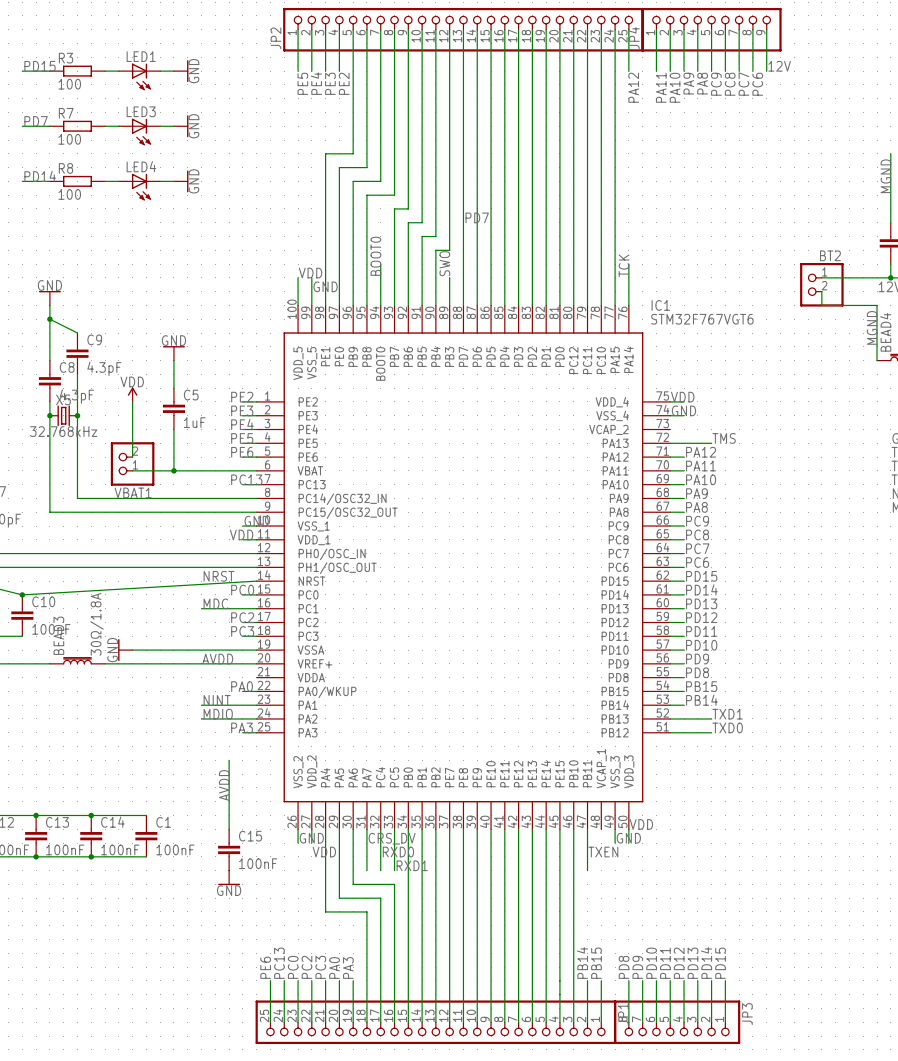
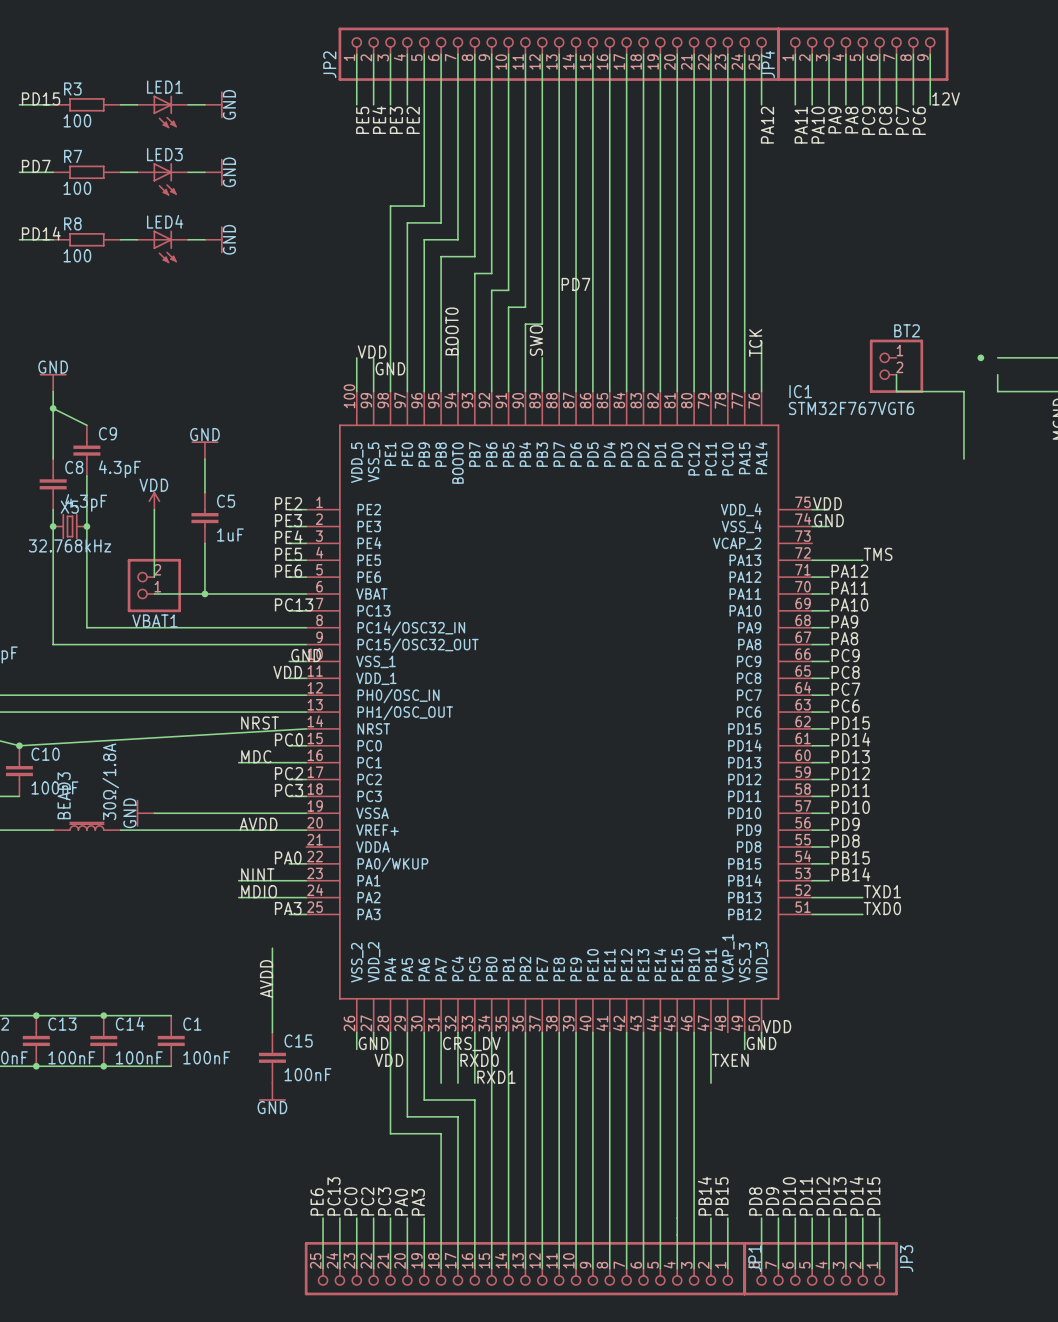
junction: none -> (980, 357)
BT2 position: (821, 284) -> (896, 366)
wire: none -> (896, 374) (896, 391) (963, 391) (963, 459)

